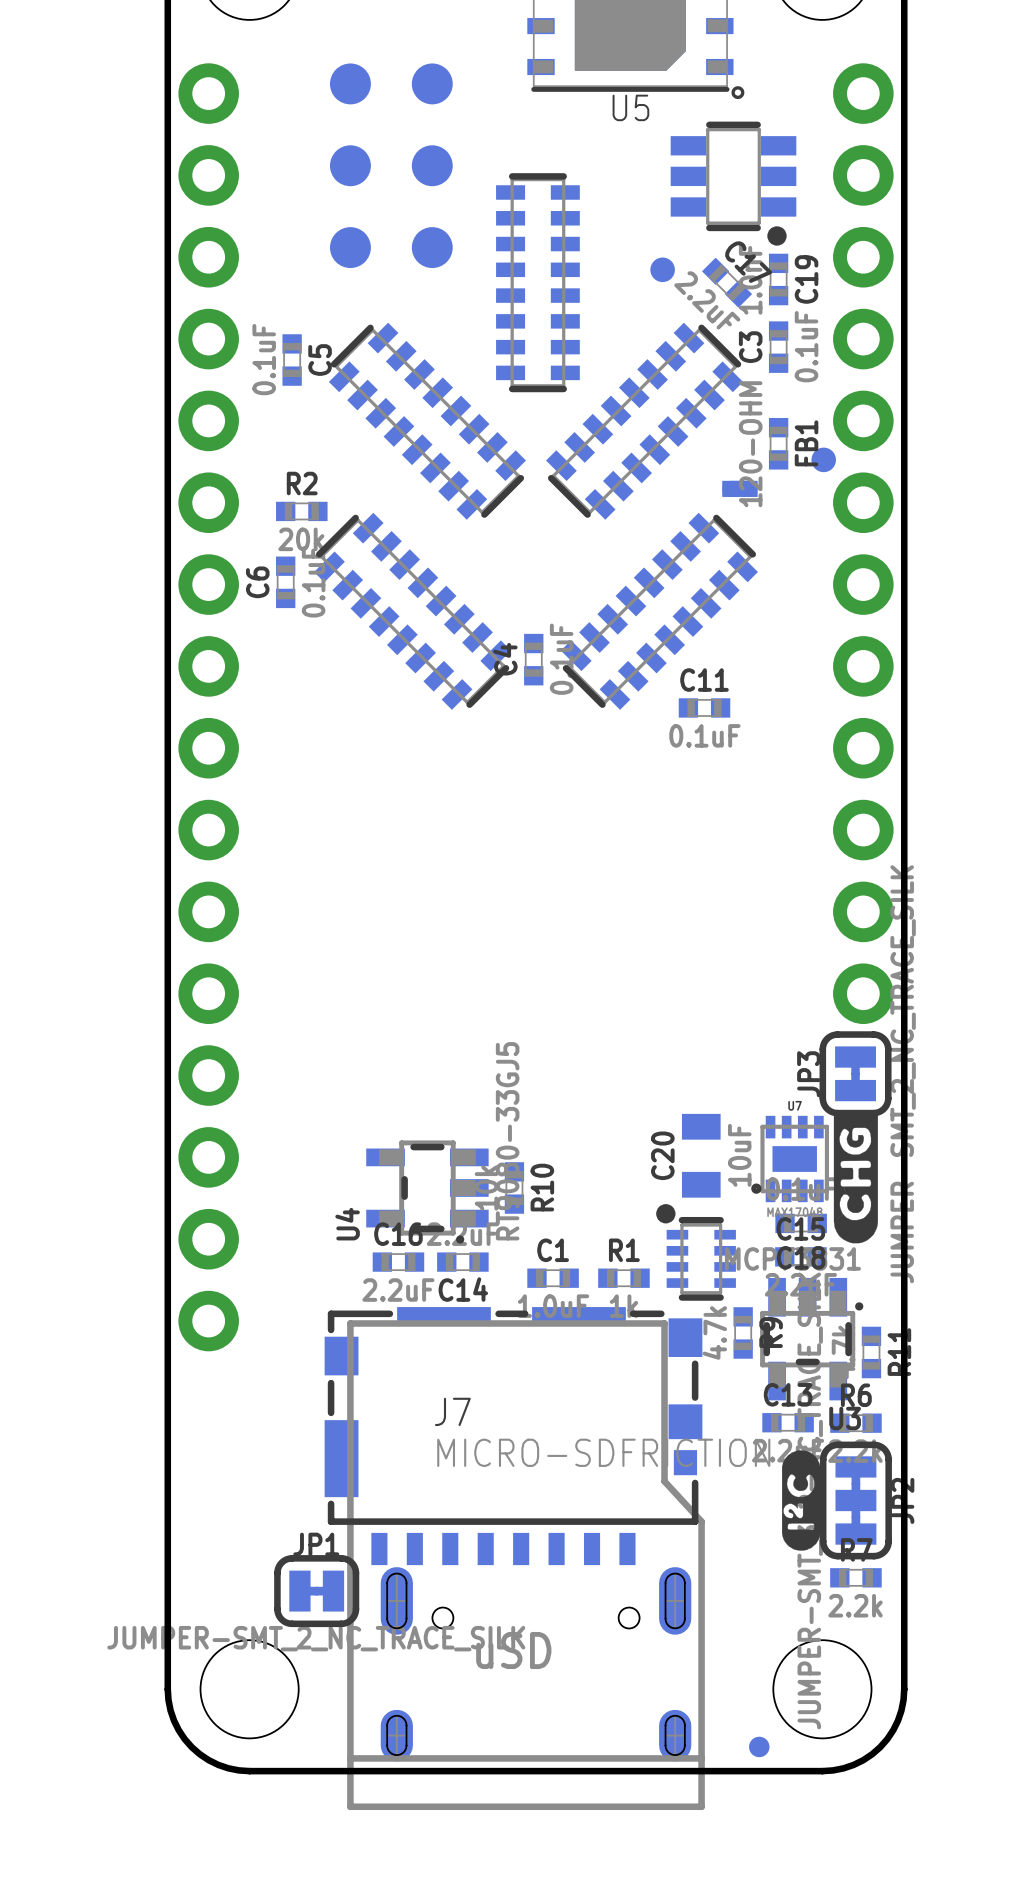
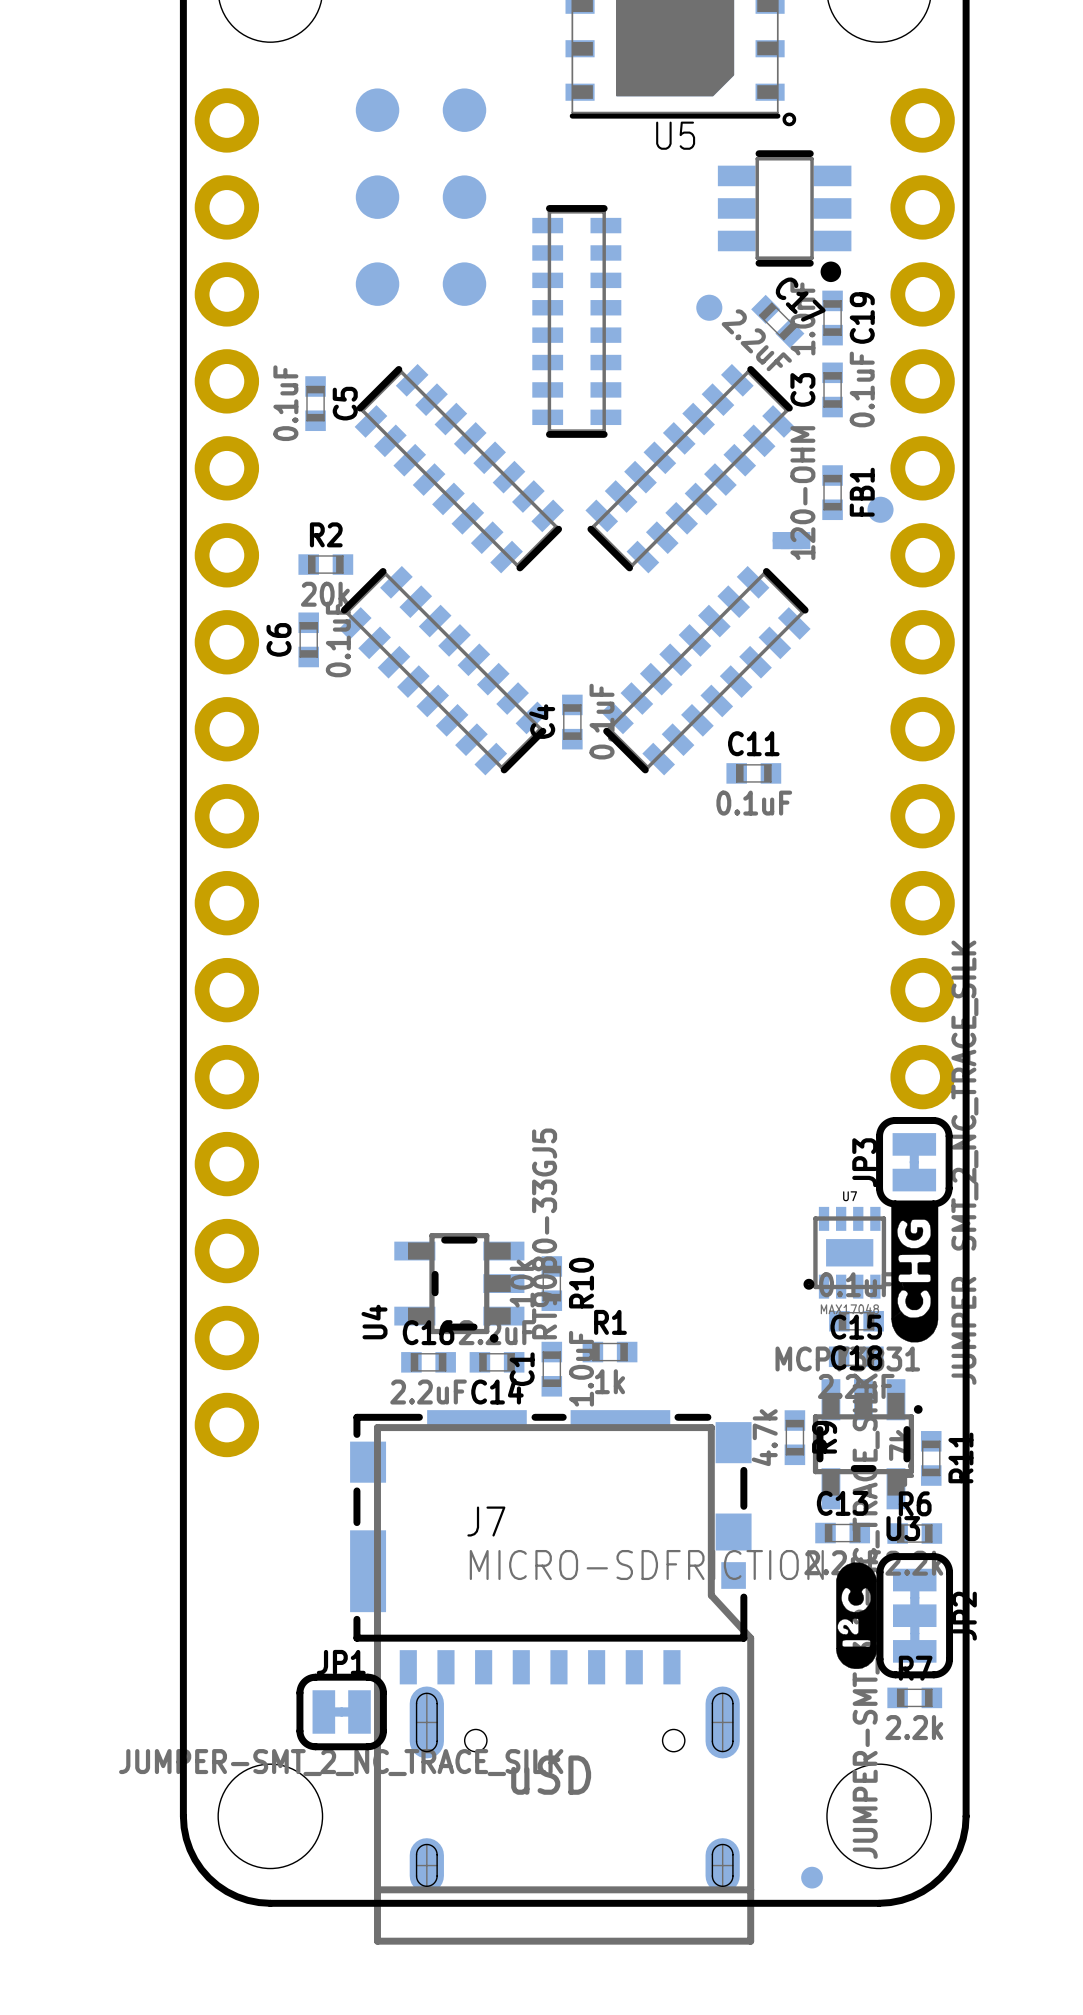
C20: 10uF (701, 1155) -> none
part: (696, 1252) -> none
C1 rotation: 0° (553, 1278) -> 90° clockwise (551, 1369)
C1 position: (553, 1278) -> (551, 1369)
R1 position: (623, 1278) -> (610, 1352)

